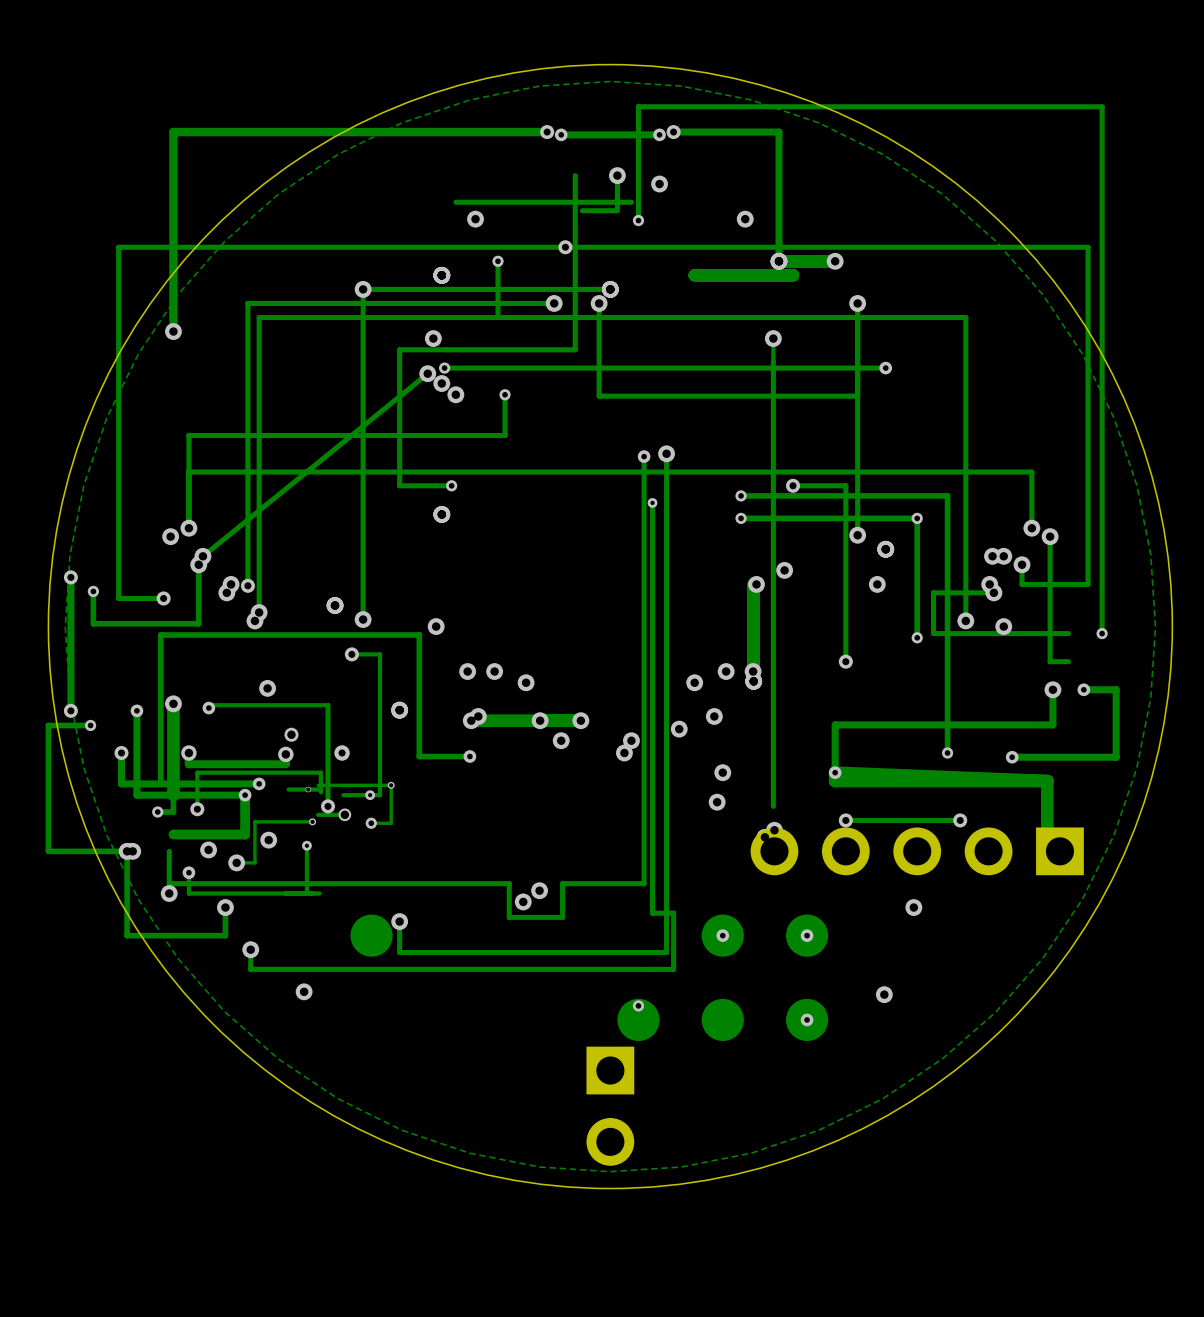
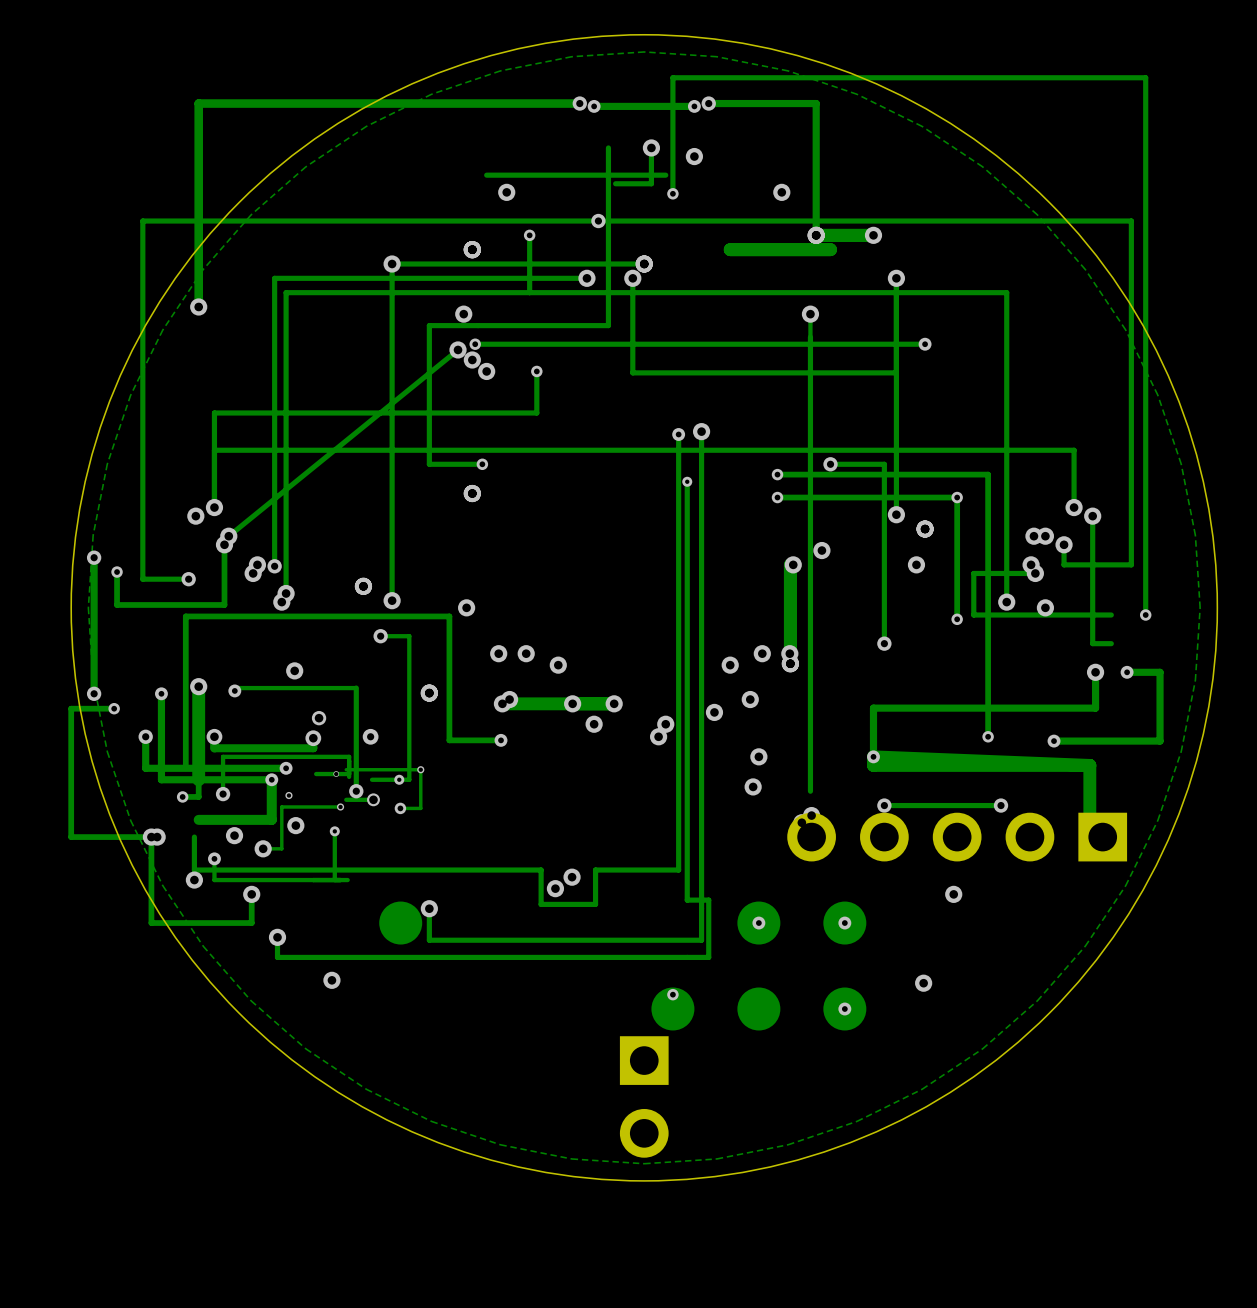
via: none -> (288, 795)

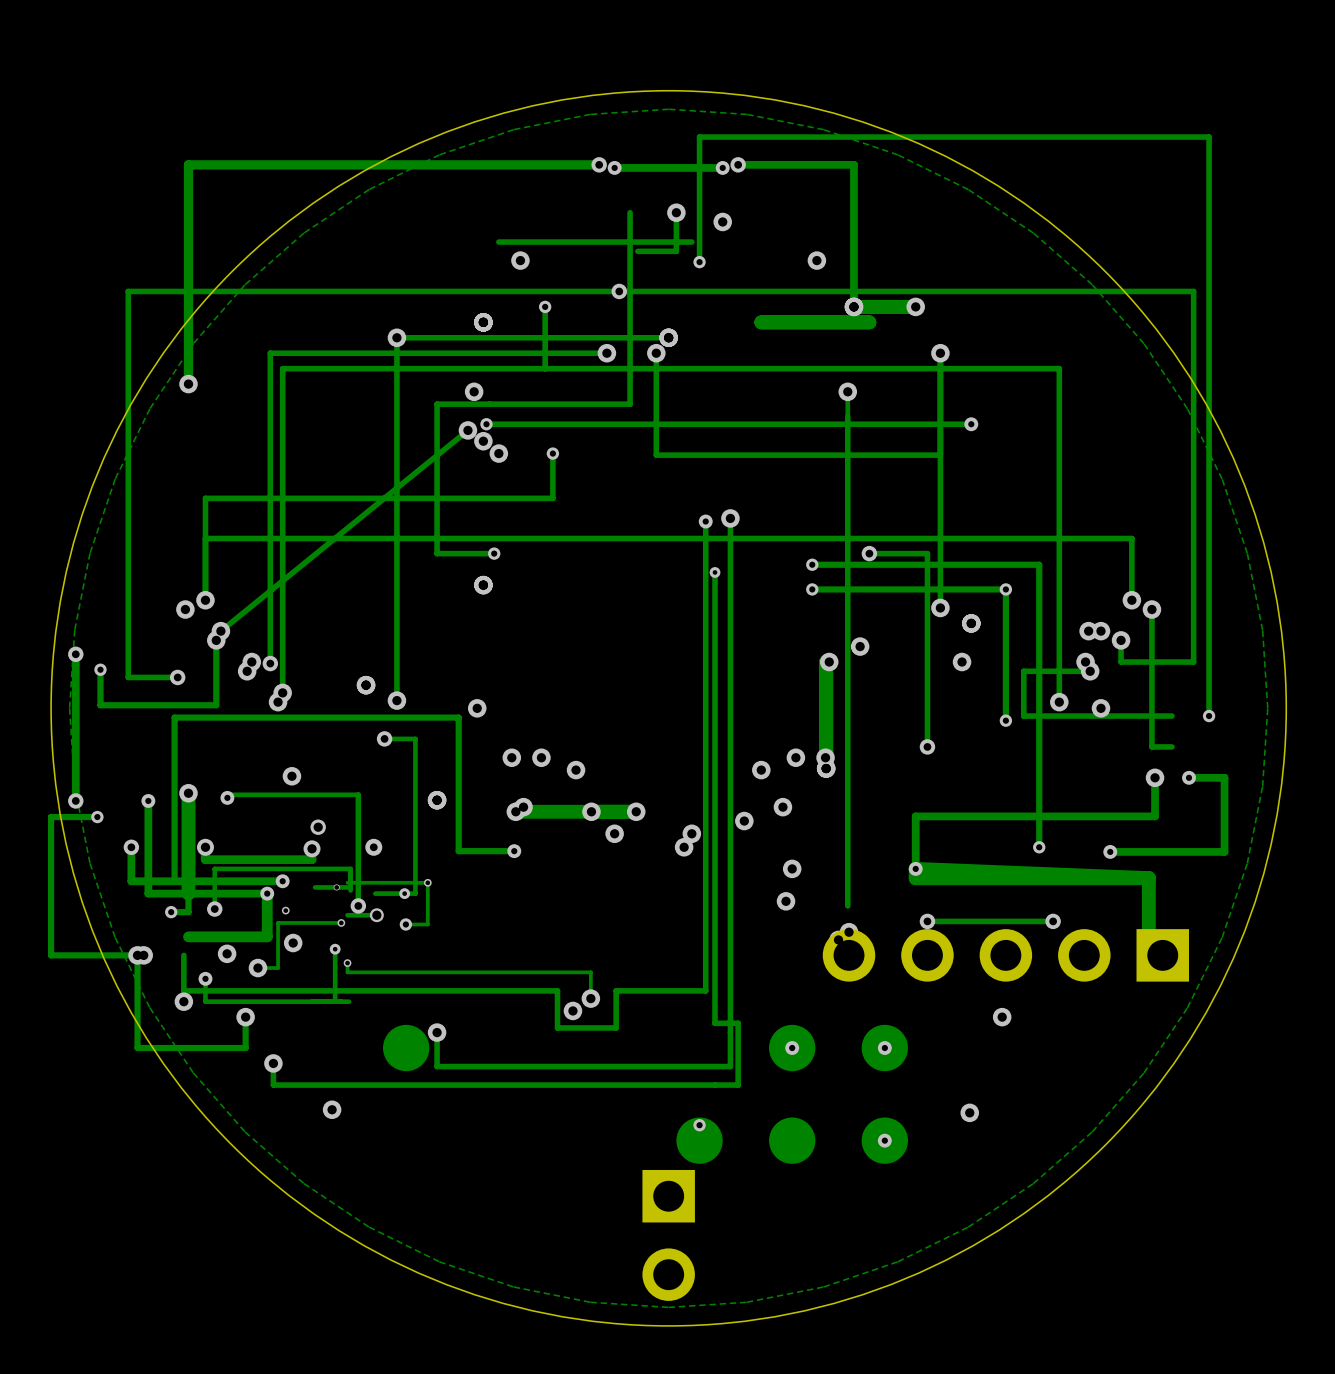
track: none -> (347, 963) (347, 972) (590, 972) (590, 998)
via: none -> (347, 963)

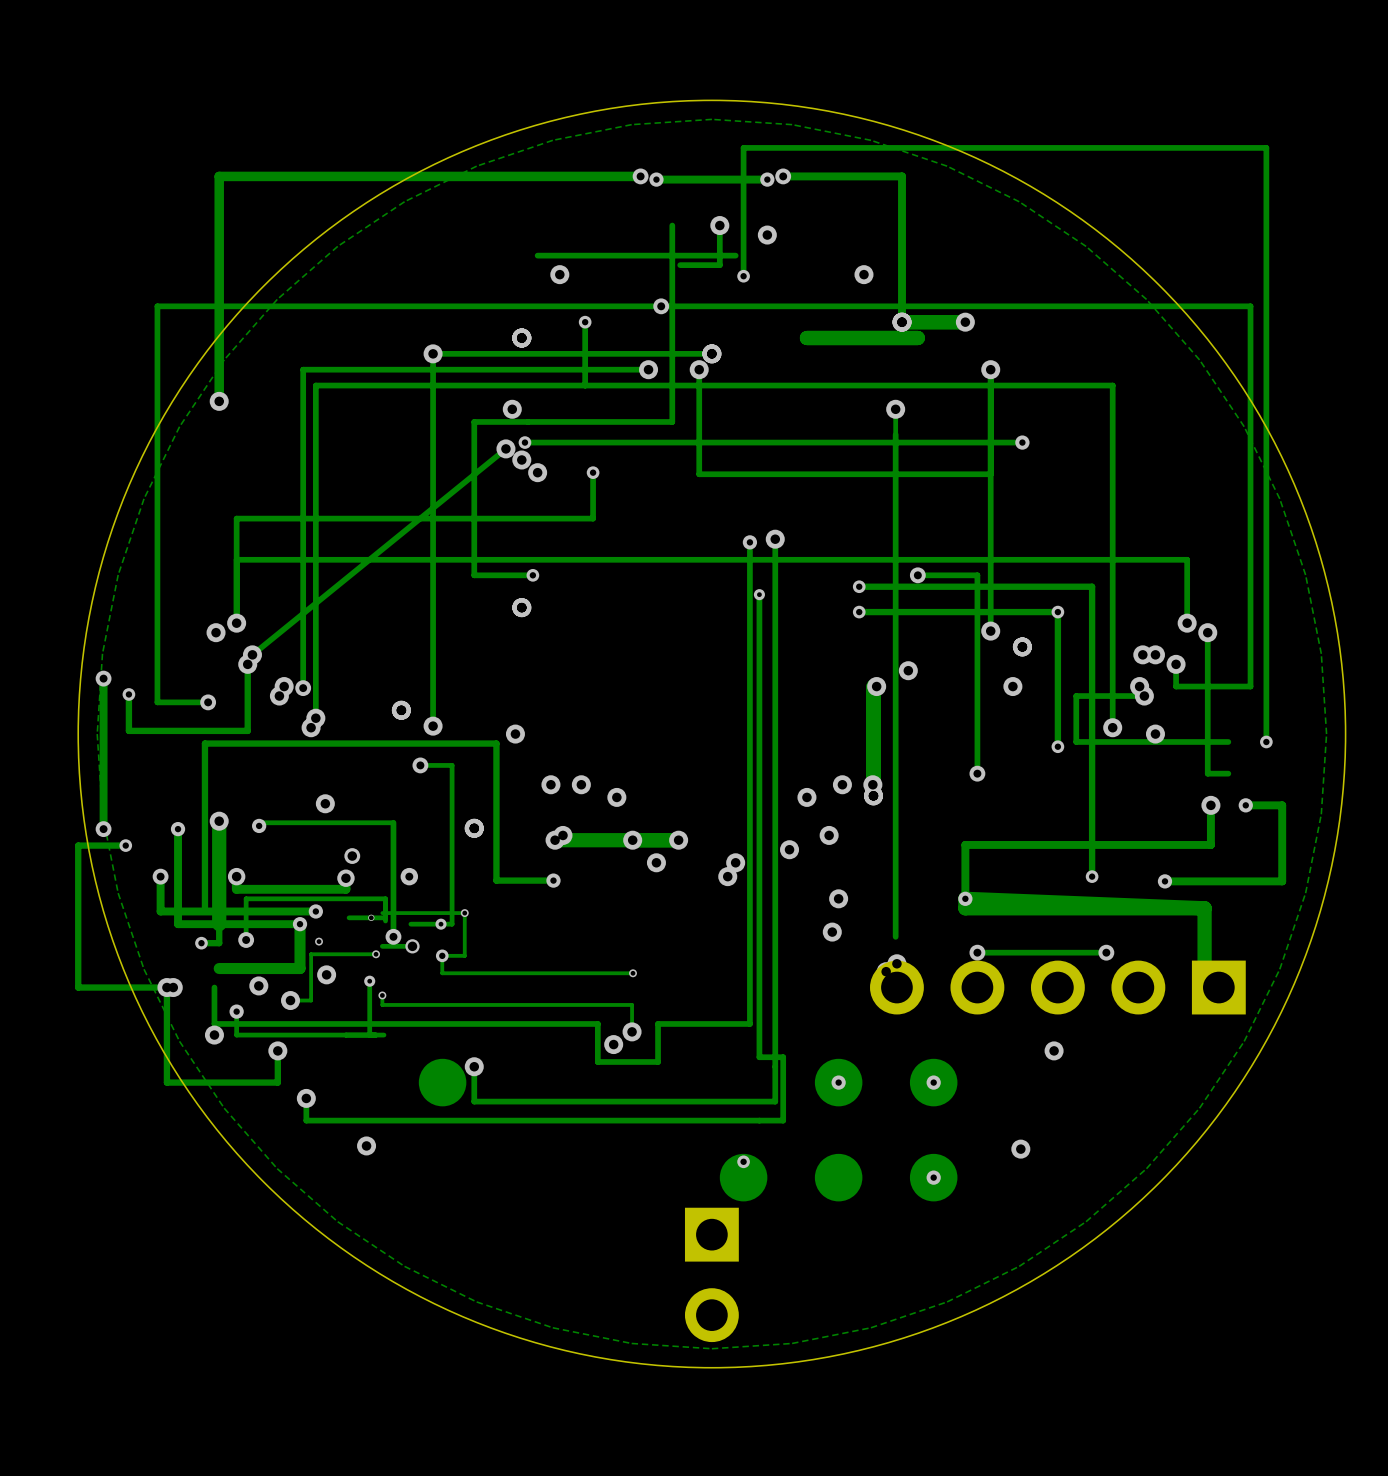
track: none -> (442, 955) (442, 973) (633, 973)
via: none -> (633, 973)

